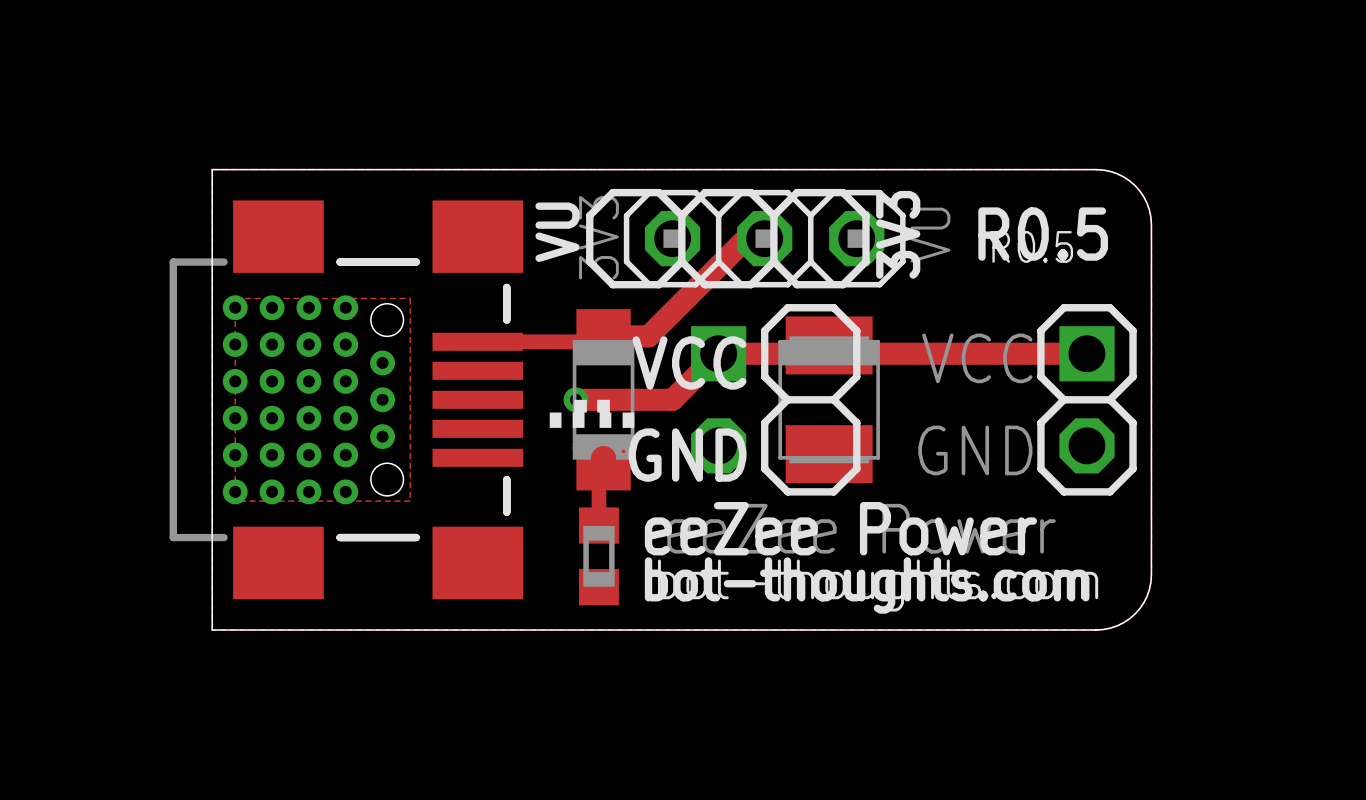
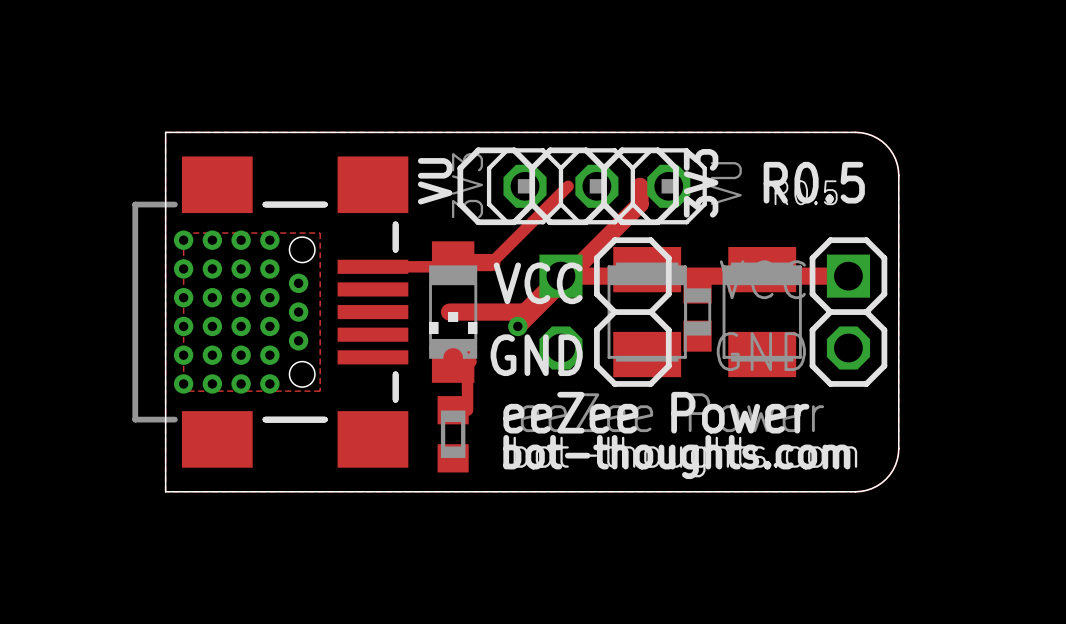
track: (764, 238) (746, 238) (648, 336) (630, 336) -> (568, 186) (491, 262)
track: none -> (640, 186) (640, 204) (517, 326)
via position: (575, 399) -> (517, 326)
part position: (603, 399) -> (453, 312)
part: none -> (697, 312)
part: none -> (762, 312)
part position: (598, 556) -> (453, 434)

